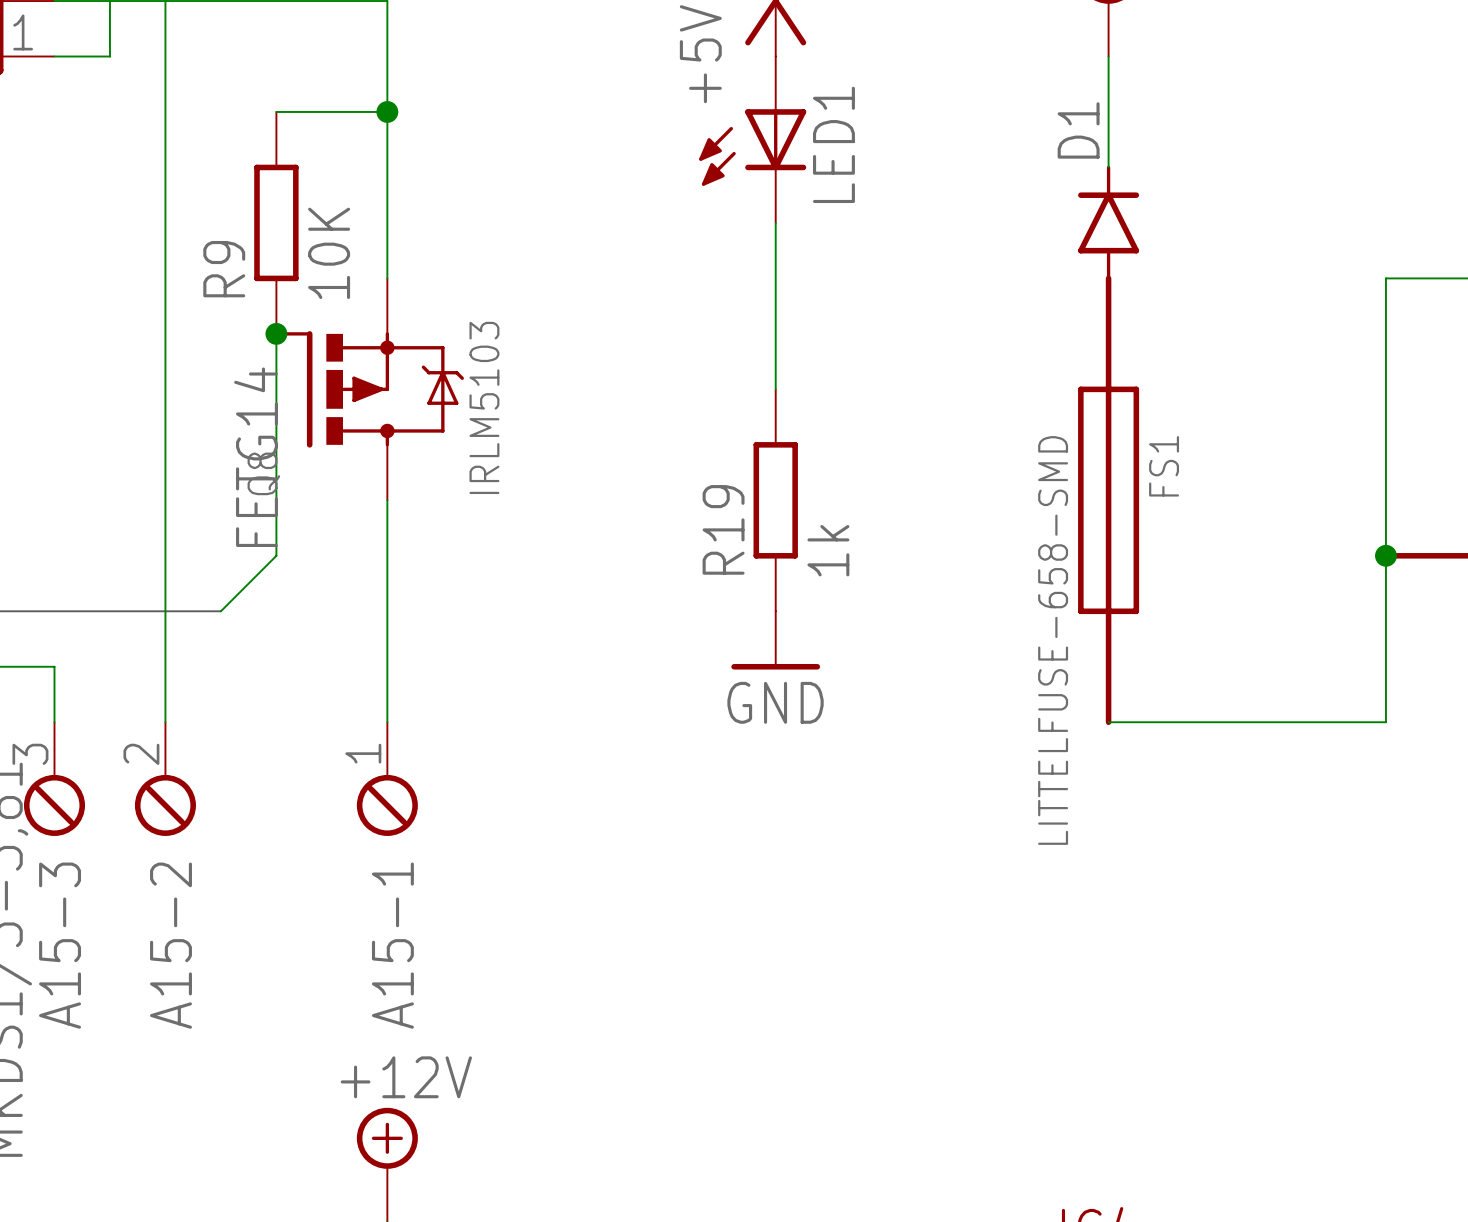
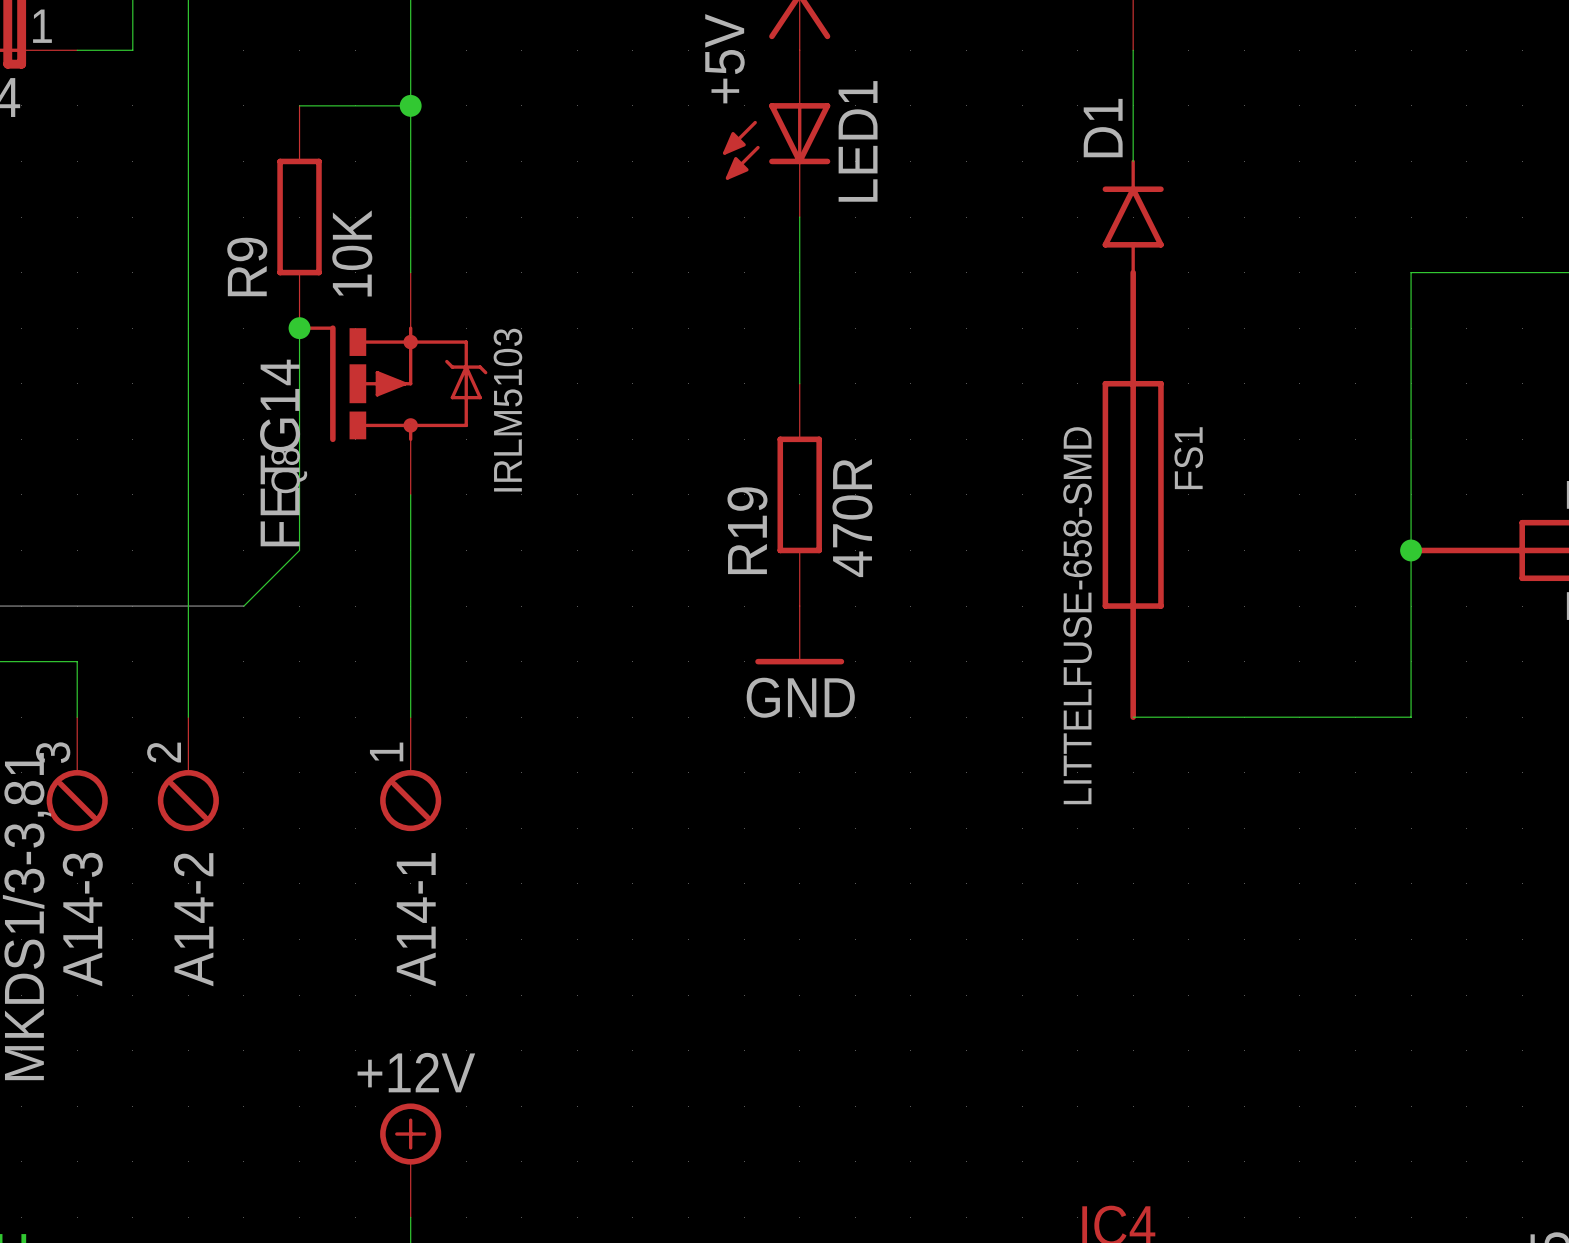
R19 value: 1k (828, 550) -> 470R (852, 518)
A15-3 name: A15-3 (60, 945) -> A14-3 (82, 919)
A15-2 name: A15-2 (171, 945) -> A14-2 (193, 919)
A15-1 name: A15-1 (392, 945) -> A14-1 (416, 919)

